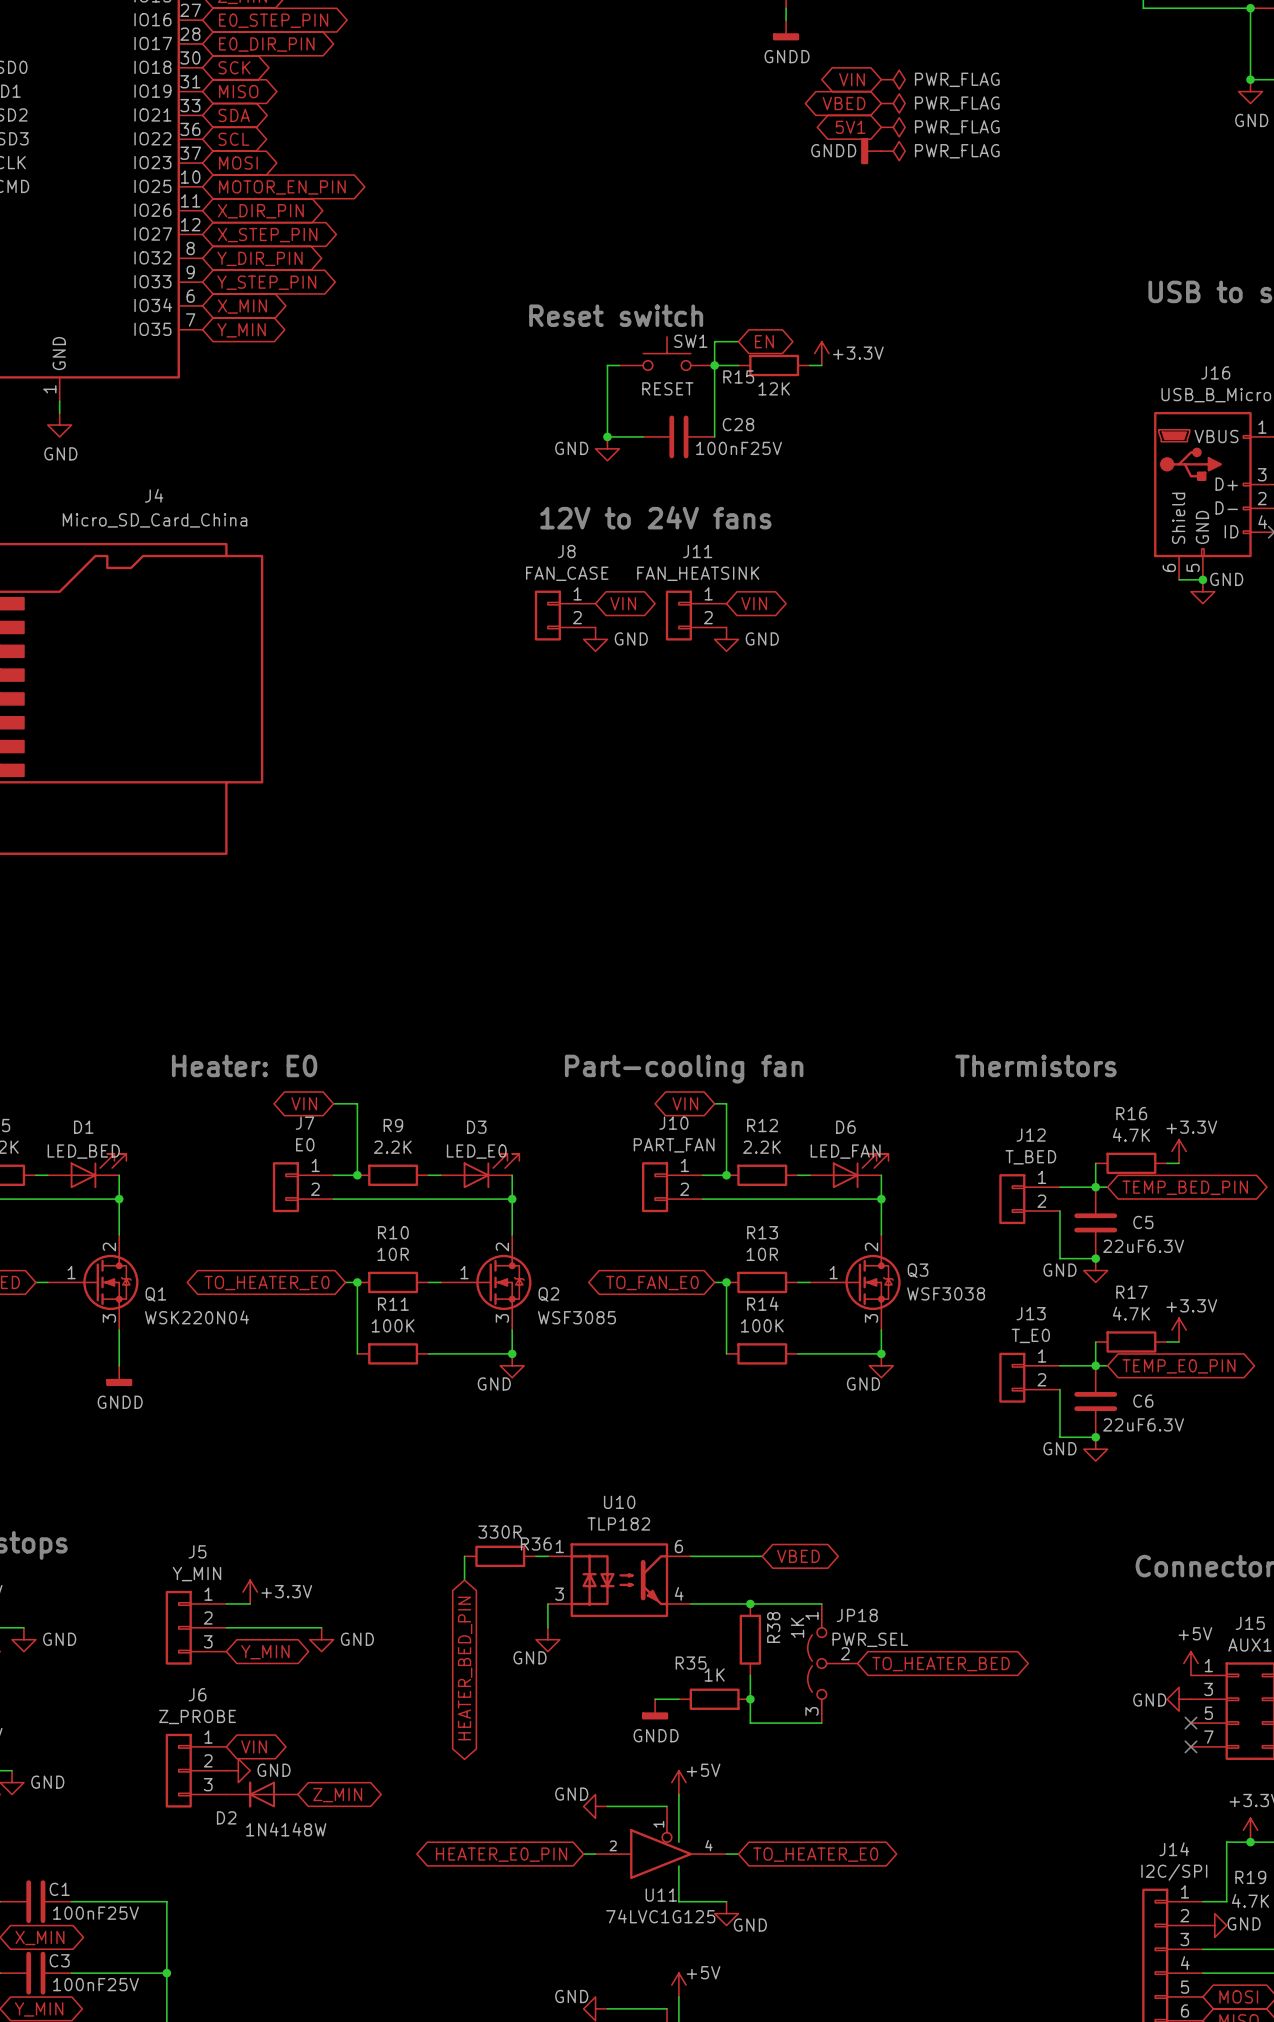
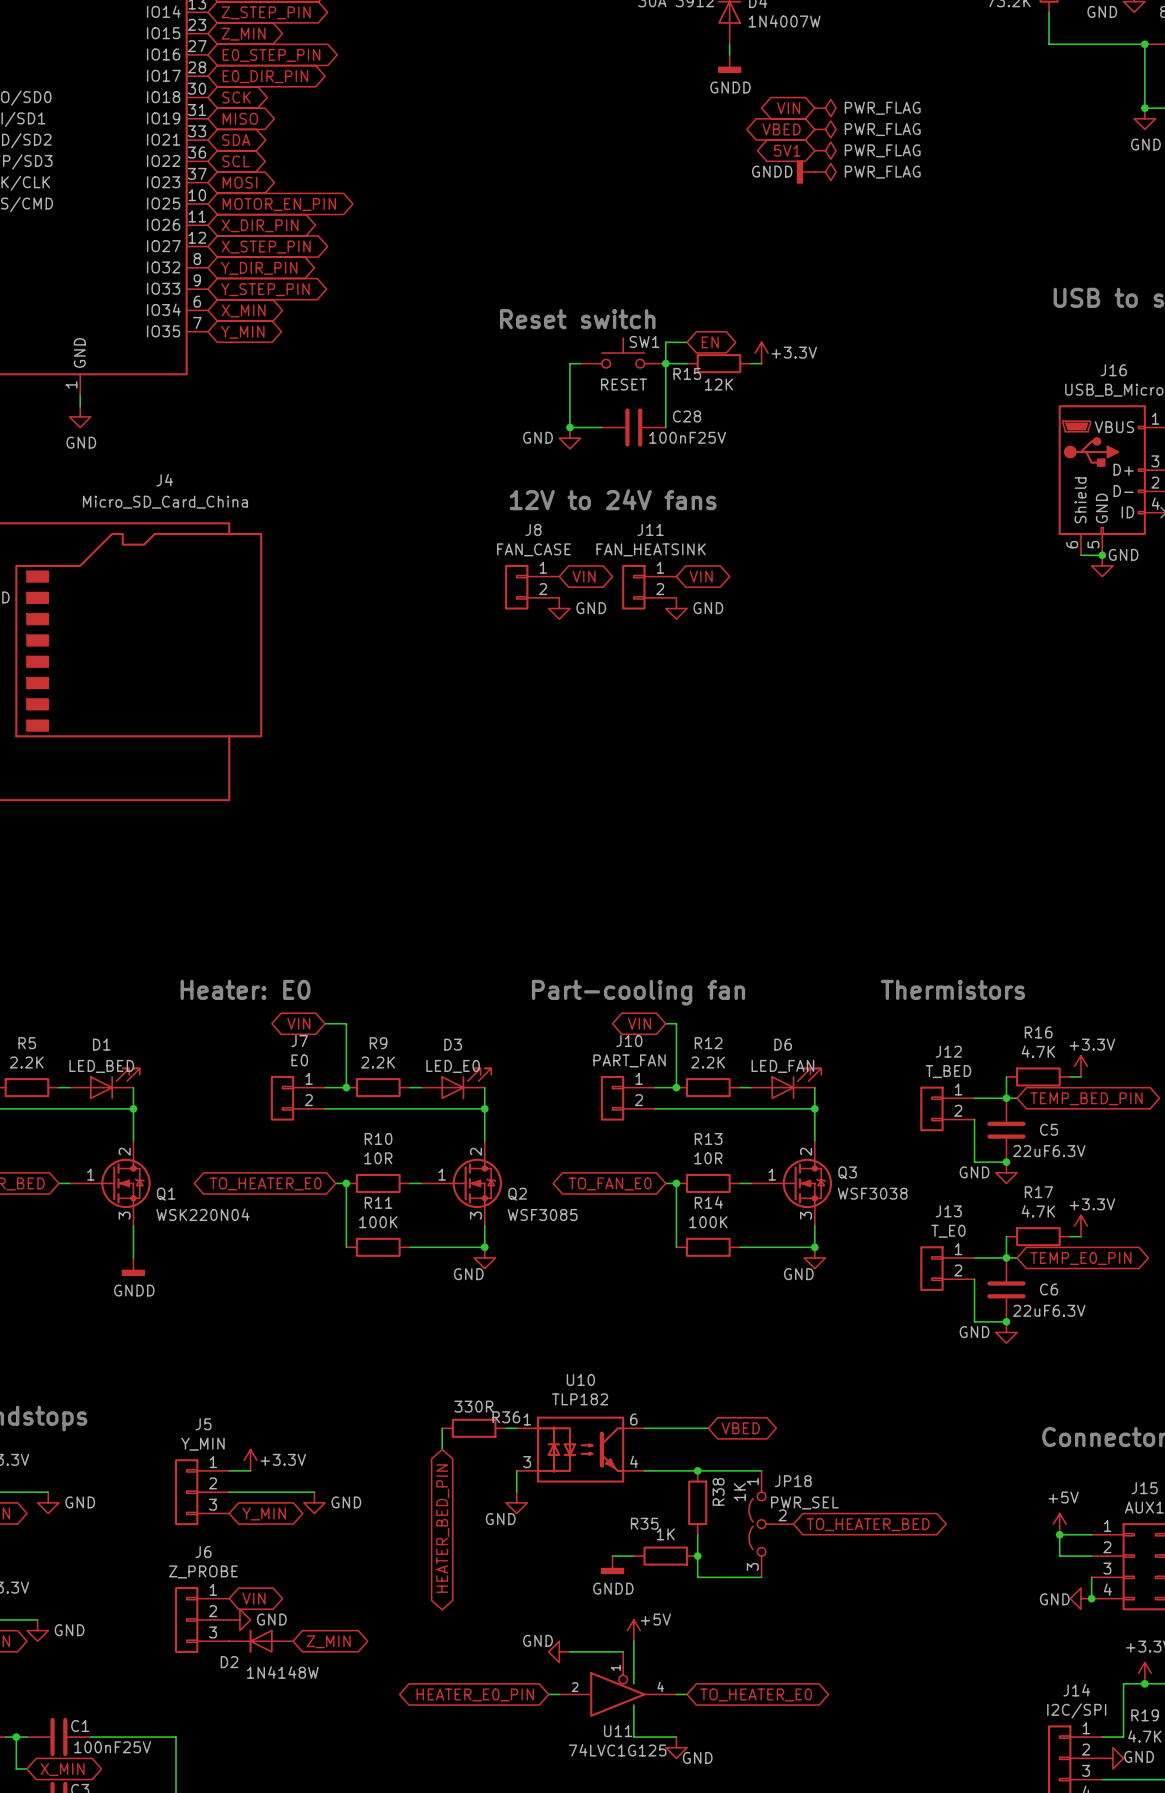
power symbol position: +5V (1190, 1663) -> +5V (1059, 1524)
junction: none -> (1059, 1534)
wire: none -> (1091, 1534) (1059, 1534) (1059, 1556) (1091, 1556)
J15 pin number: 3 (1208, 1689) -> 2 (1107, 1547)
power symbol position: GND (1179, 1699) -> GND (1080, 1598)
J15 pin number: 5 (1208, 1713) -> 3 (1107, 1568)
wire: none -> (1091, 1577) (1091, 1598)
no-connect mark: (1190, 1723) -> none
J15 pin number: 7 (1208, 1737) -> 4 (1107, 1589)
no-connect mark: (1190, 1746) -> none
junction: none -> (1091, 1598)

